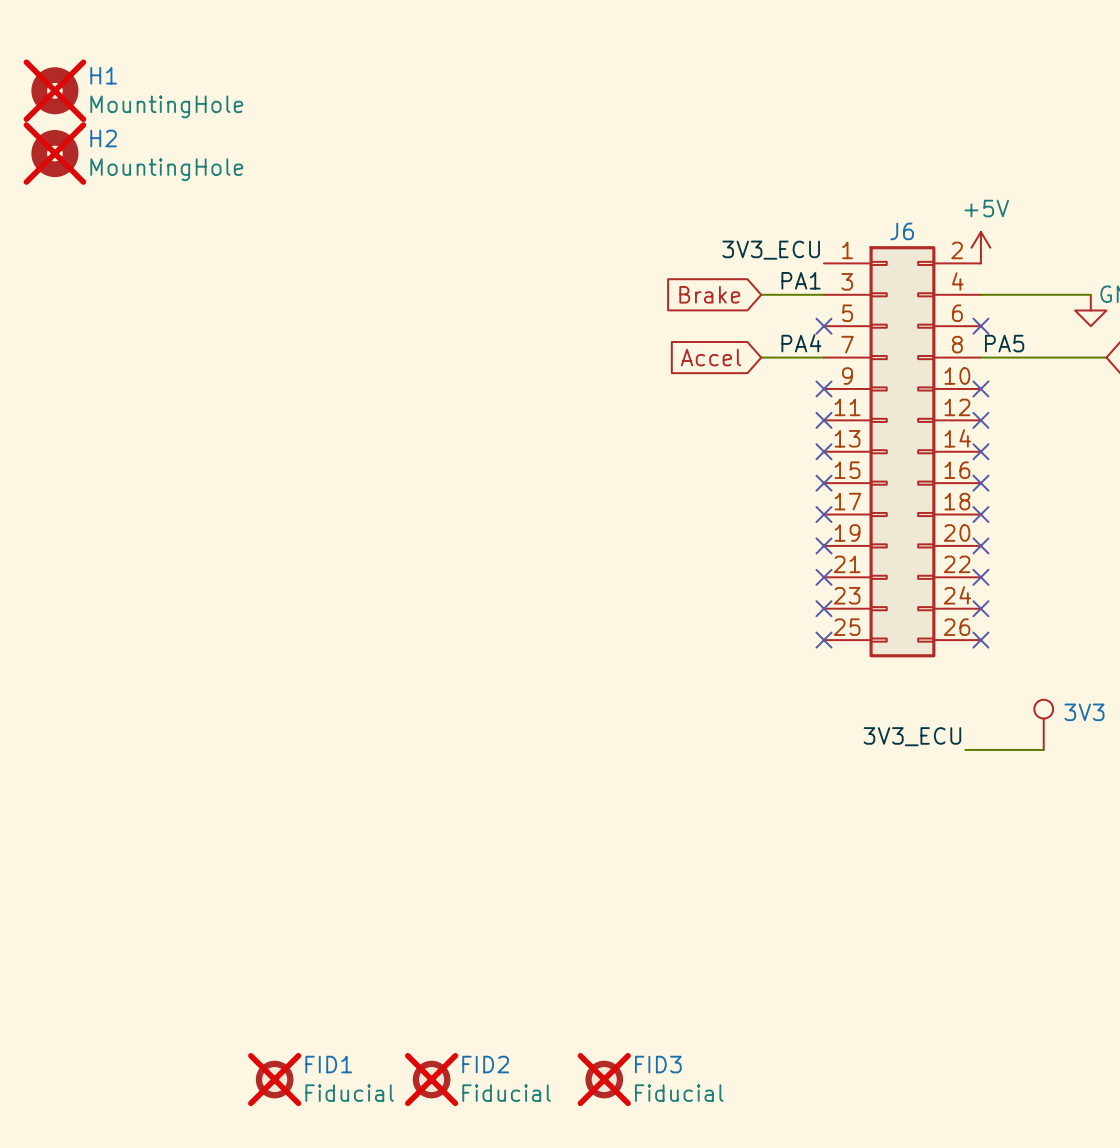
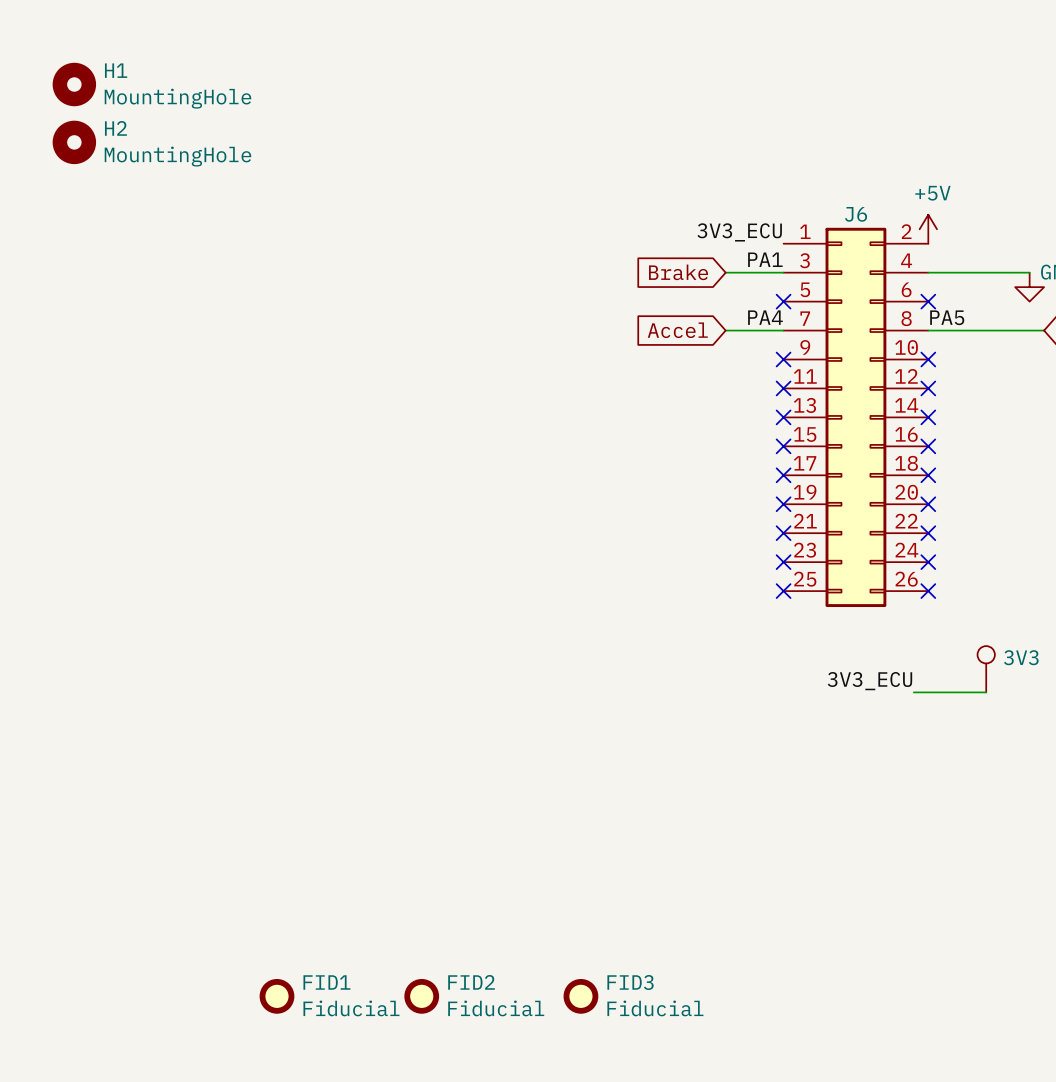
H1 do-not-place cross: (54, 90) -> none
H2 do-not-place cross: (54, 153) -> none
FID1 do-not-place cross: (274, 1079) -> none
FID2 do-not-place cross: (431, 1079) -> none
FID3 do-not-place cross: (604, 1079) -> none

